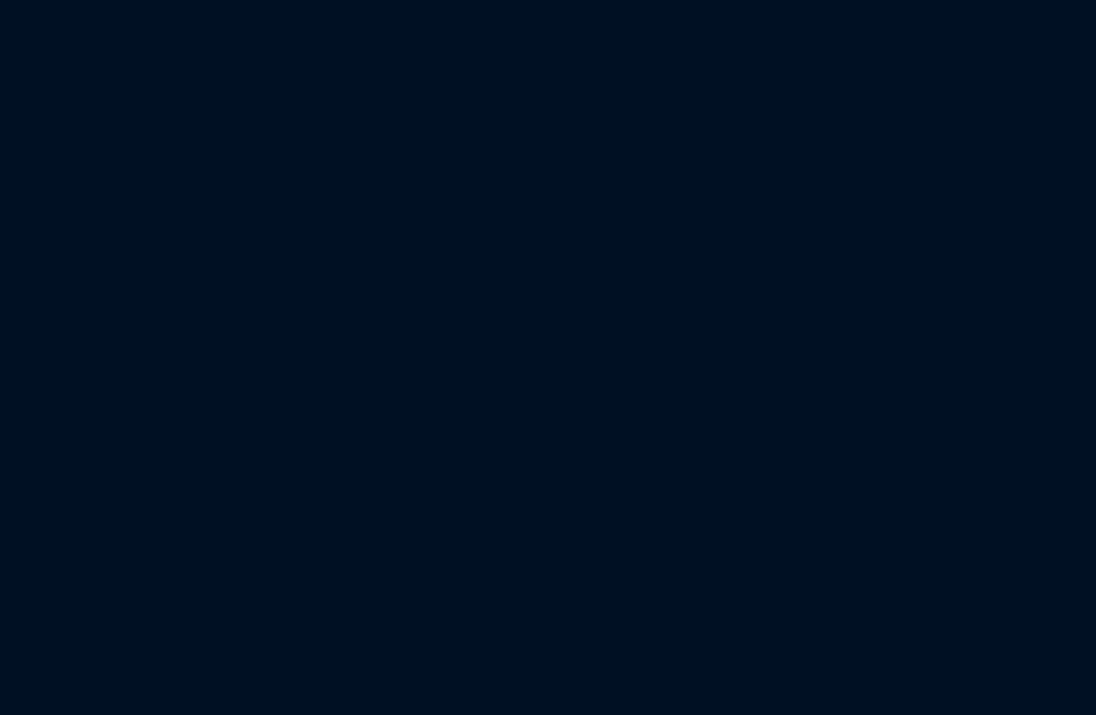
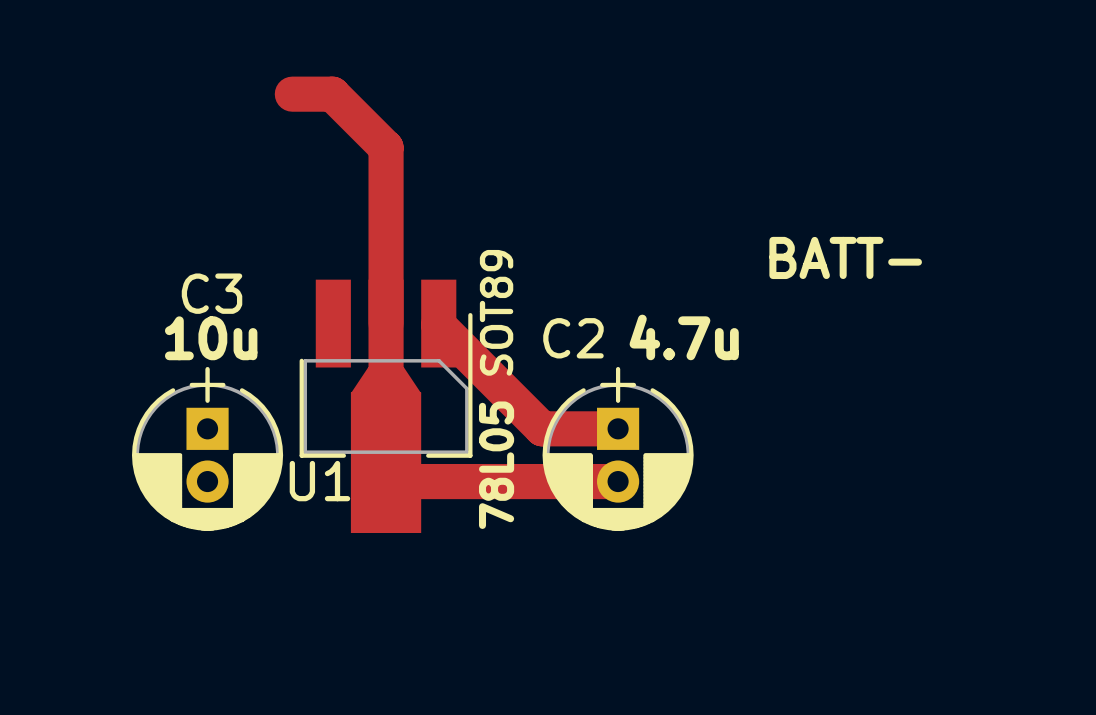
track: none -> (292, 94) (332, 94) (386, 147) (386, 462) (404, 481) (618, 481)
text: none -> BATT- (845, 257)
text: none -> SOT89 (496, 312)
track: none -> (438, 323) (542, 428) (618, 428)
U1: none -> (386, 406)
C3: none -> 10u (207, 448)
C2: none -> 4.7u (618, 448)
text: none -> 78L05 (496, 465)

